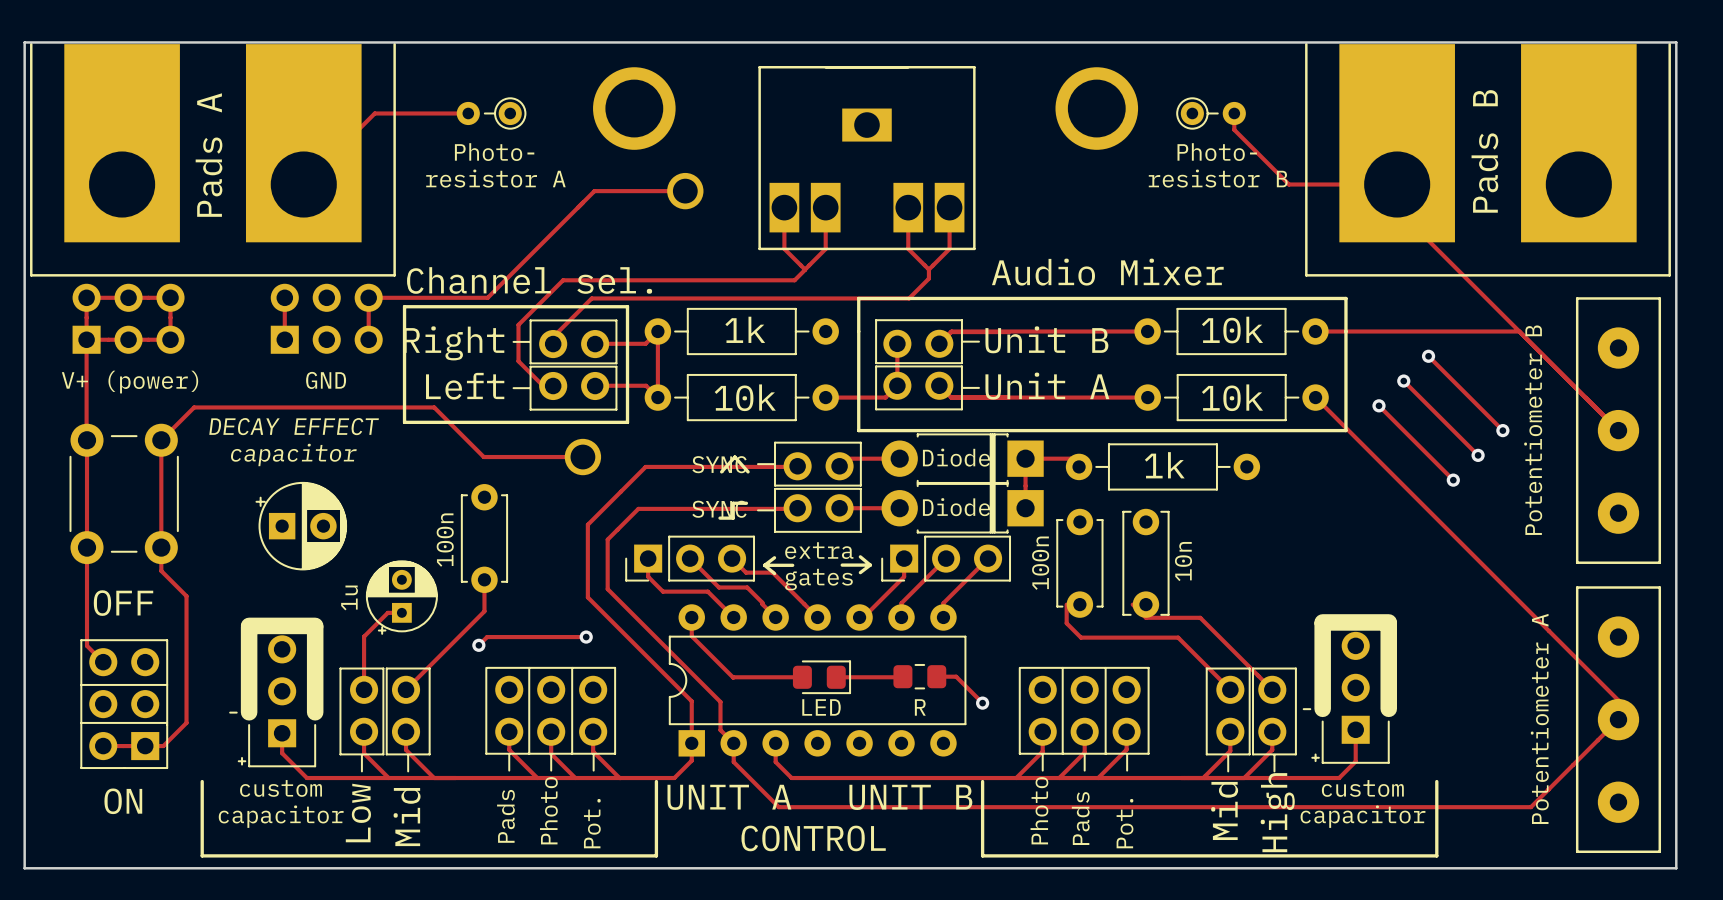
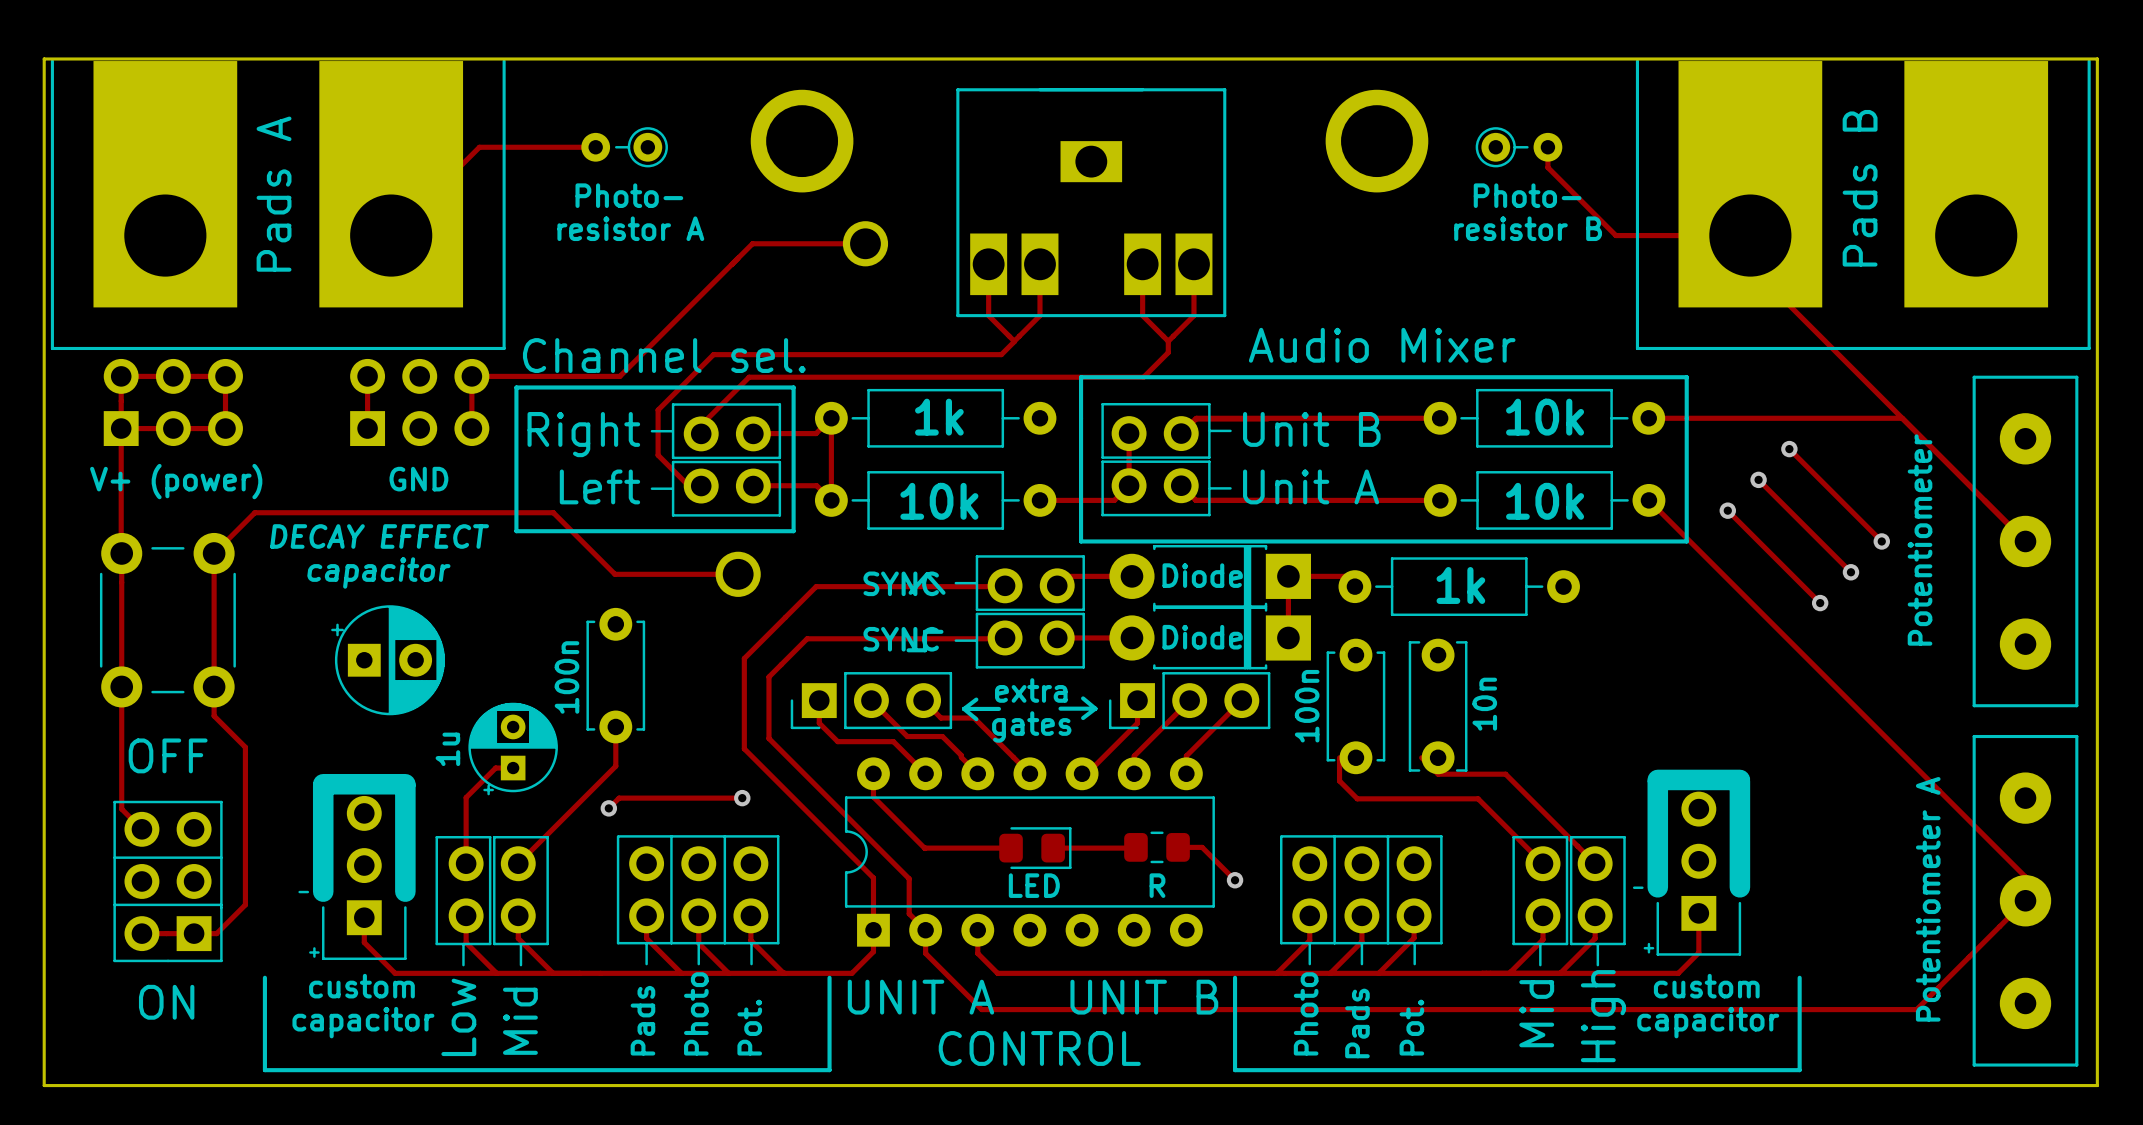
text: Potentiometer B (1533, 430) -> Potentiometer (1920, 540)

